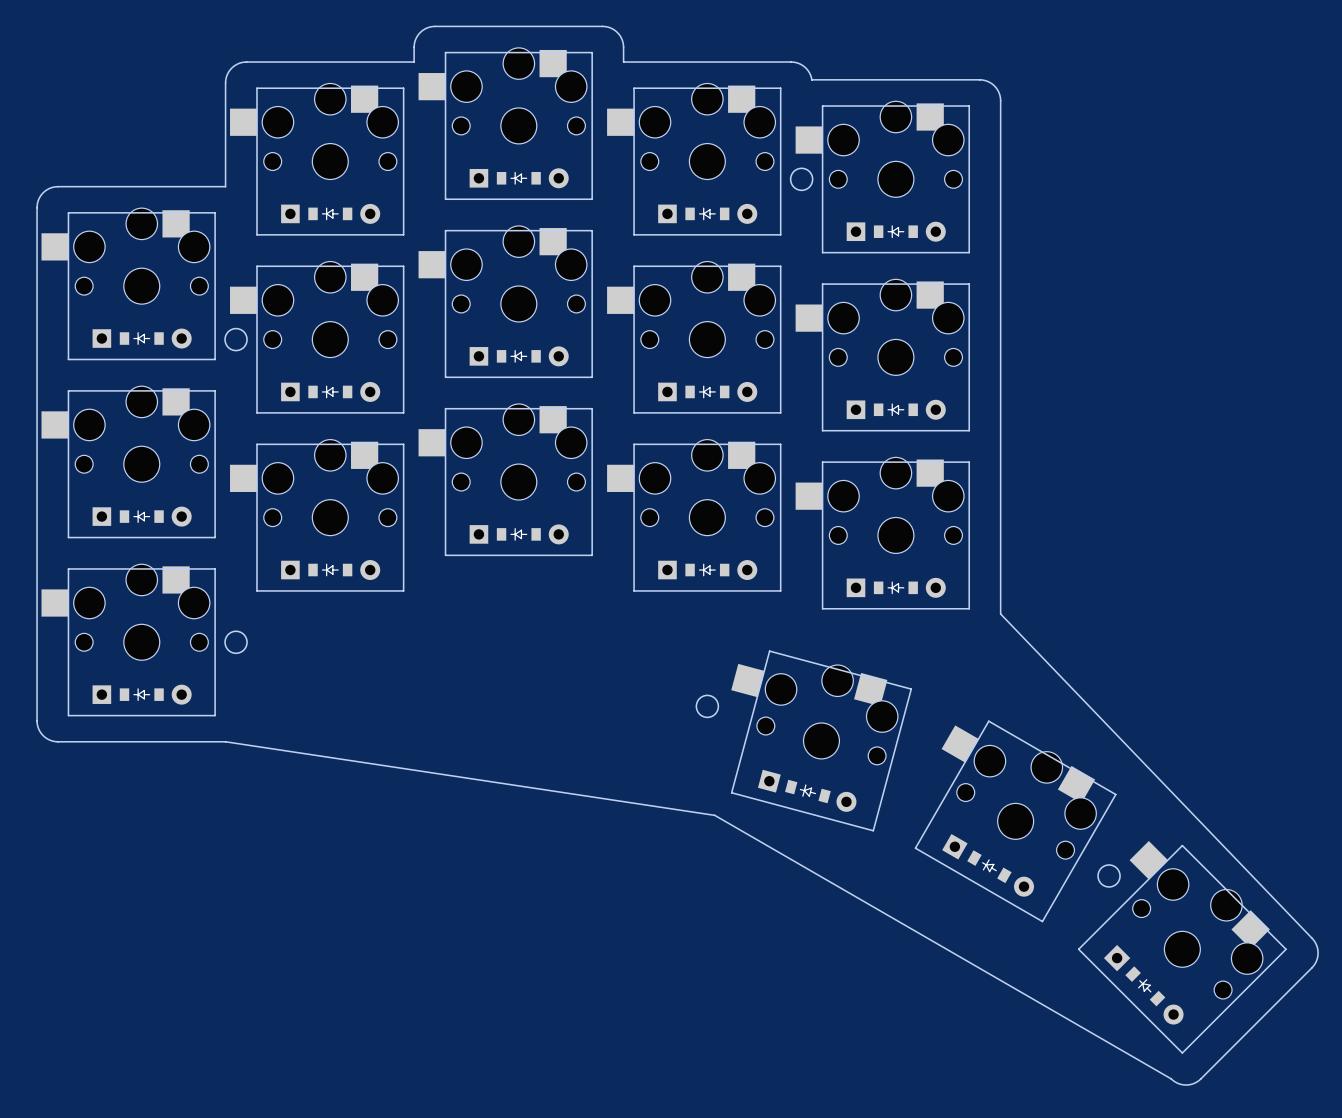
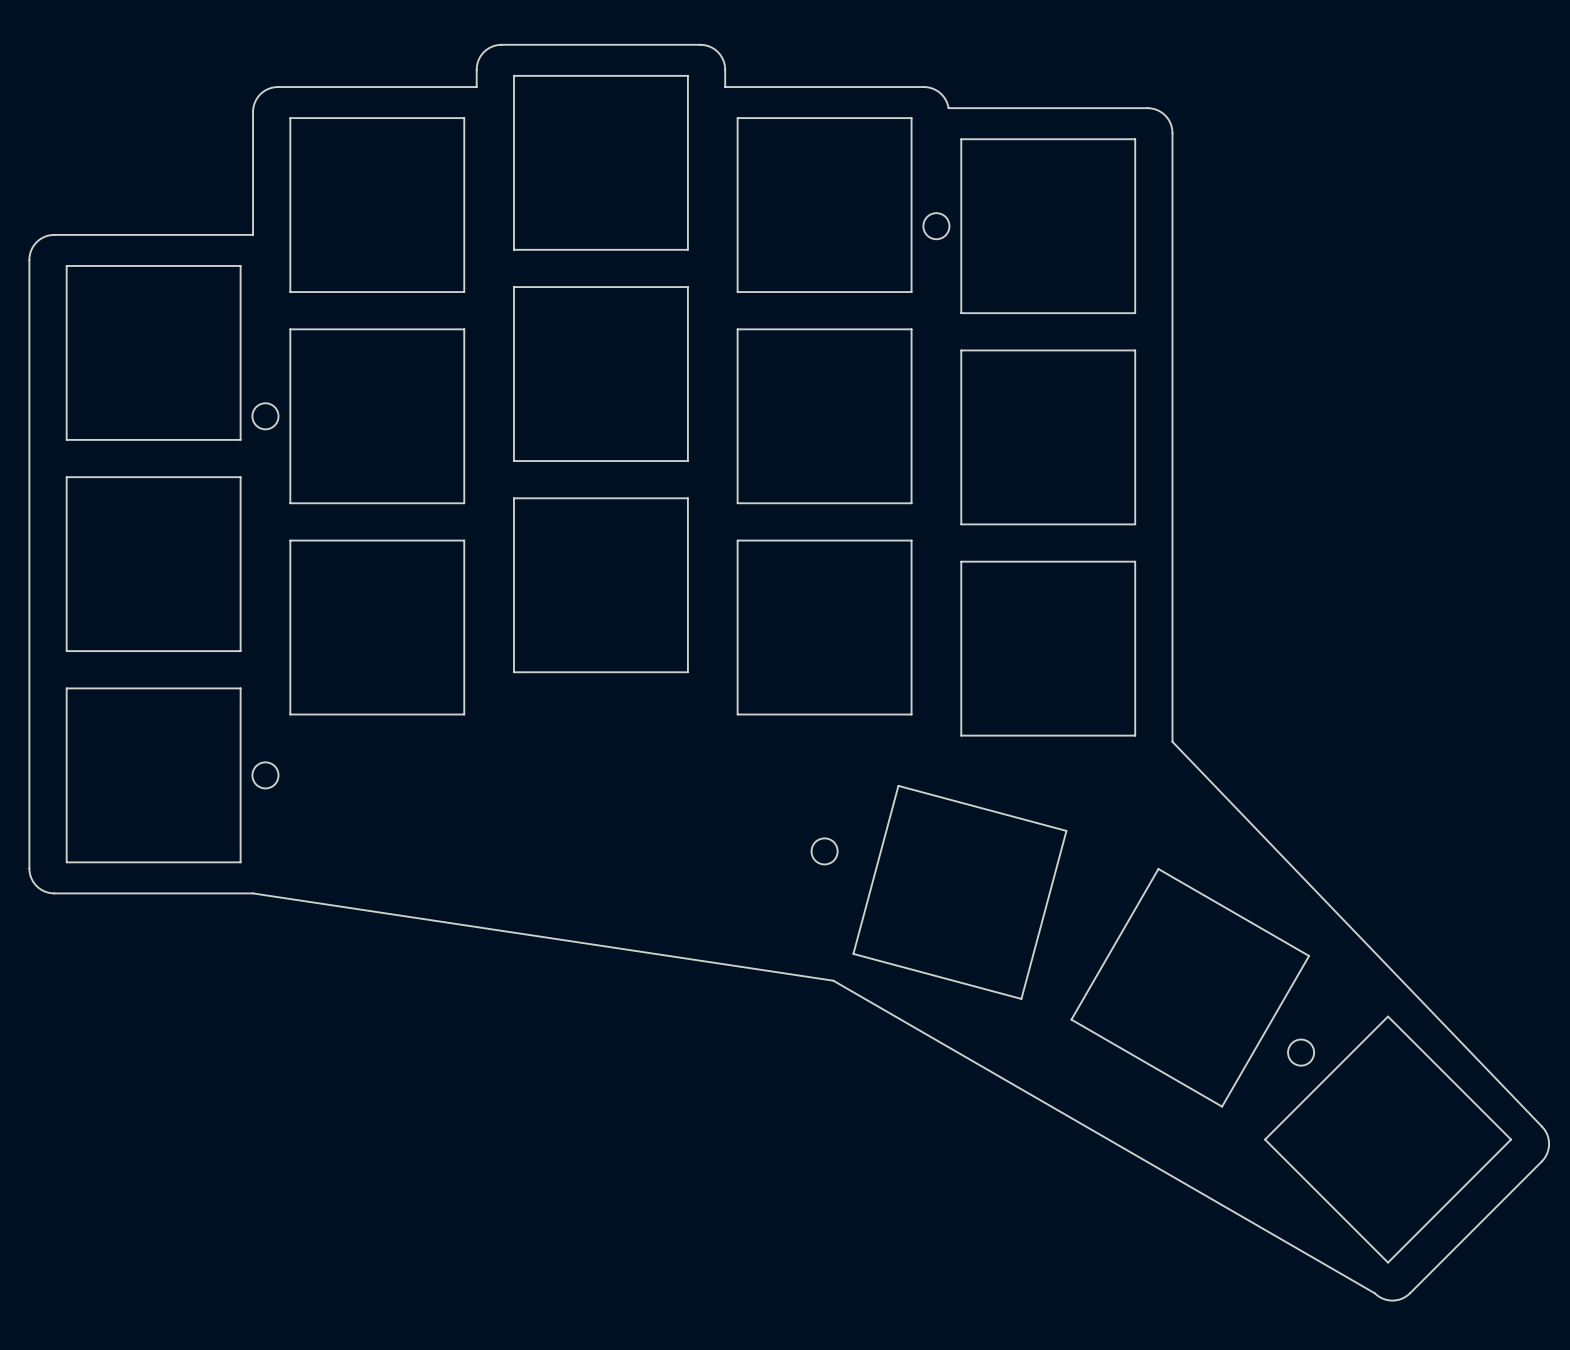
part: (502, 95) -> none
part: (314, 131) -> none
part: (691, 131) -> none
part: (879, 149) -> none
part: (519, 178) -> none
part: (330, 213) -> none
part: (707, 213) -> none
part: (896, 231) -> none
part: (125, 256) -> none
part: (502, 273) -> none
part: (314, 309) -> none
part: (691, 309) -> none
part: (879, 327) -> none
part: (142, 338) -> none
part: (519, 356) -> none
part: (330, 391) -> none
part: (707, 391) -> none
part: (896, 409) -> none
part: (125, 434) -> none
part: (502, 451) -> none
part: (314, 487) -> none
part: (691, 487) -> none
part: (879, 505) -> none
part: (142, 516) -> none
part: (519, 534) -> none
part: (330, 570) -> none
part: (707, 570) -> none
part: (896, 587) -> none
part: (125, 612) -> none
part: (142, 694) -> none
part: (814, 714) -> none
part: (807, 790) -> none
part: (1018, 792) -> none
part: (988, 865) -> none
part: (1199, 919) -> none
part: (1143, 984) -> none

